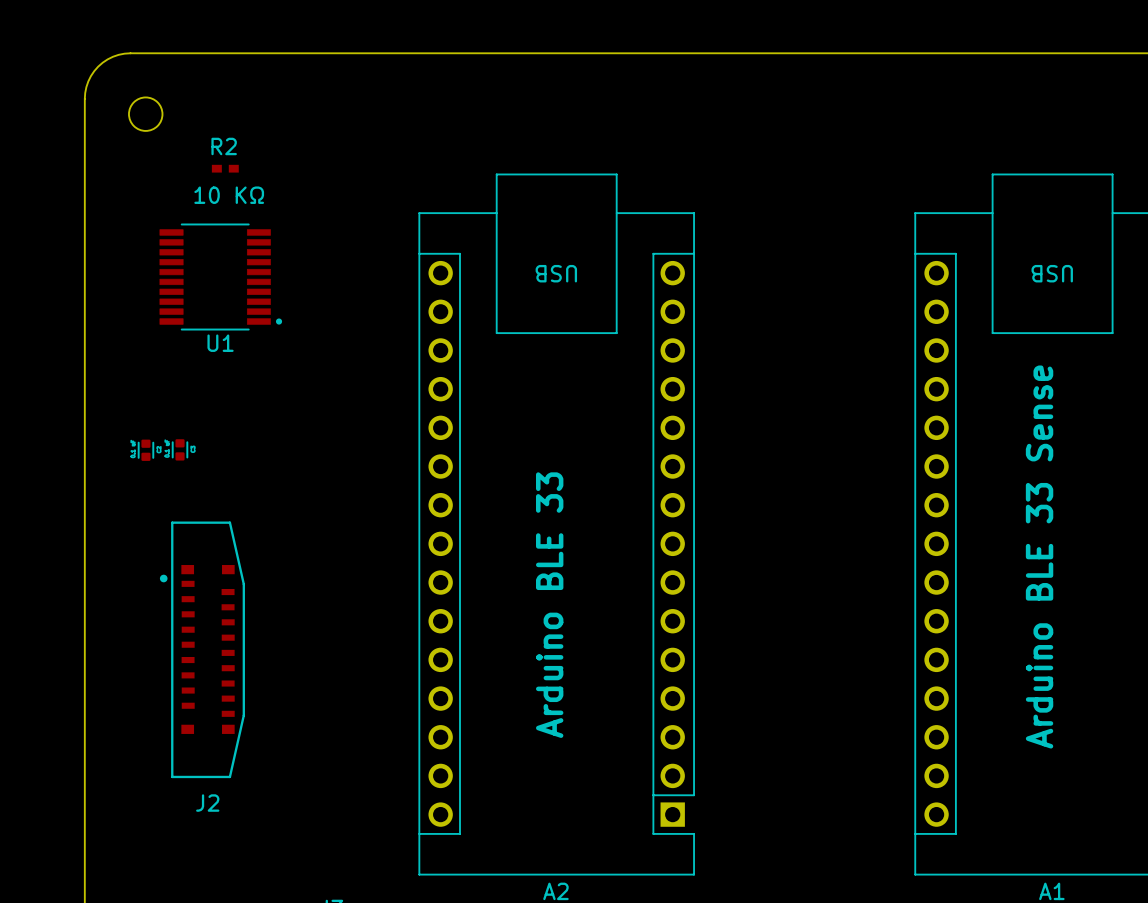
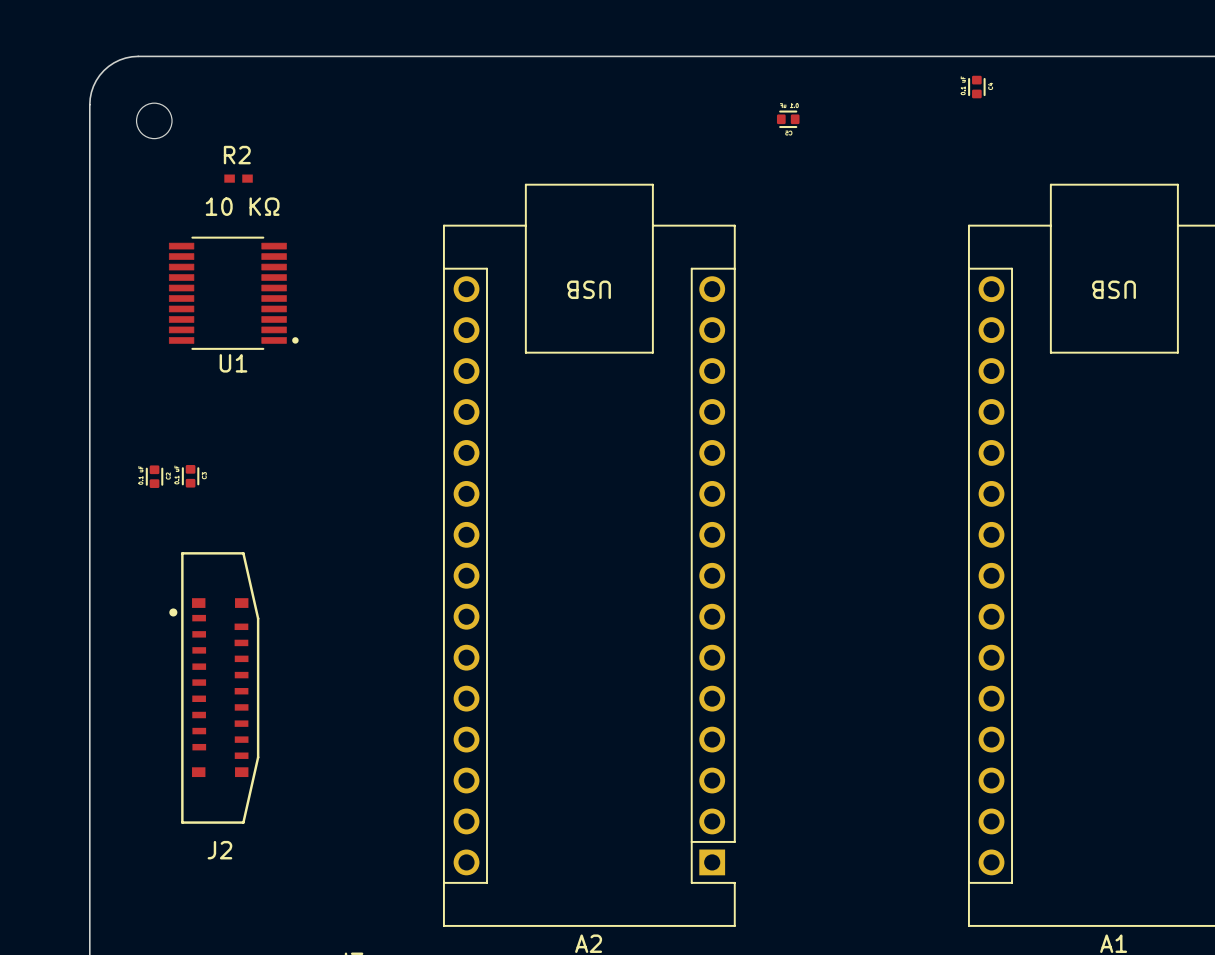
part: none -> (976, 87)
part: none -> (788, 119)
text: Arduino BLE 33 Sense (1039, 557) -> none
text: Arduino BLE 33 (549, 605) -> none

